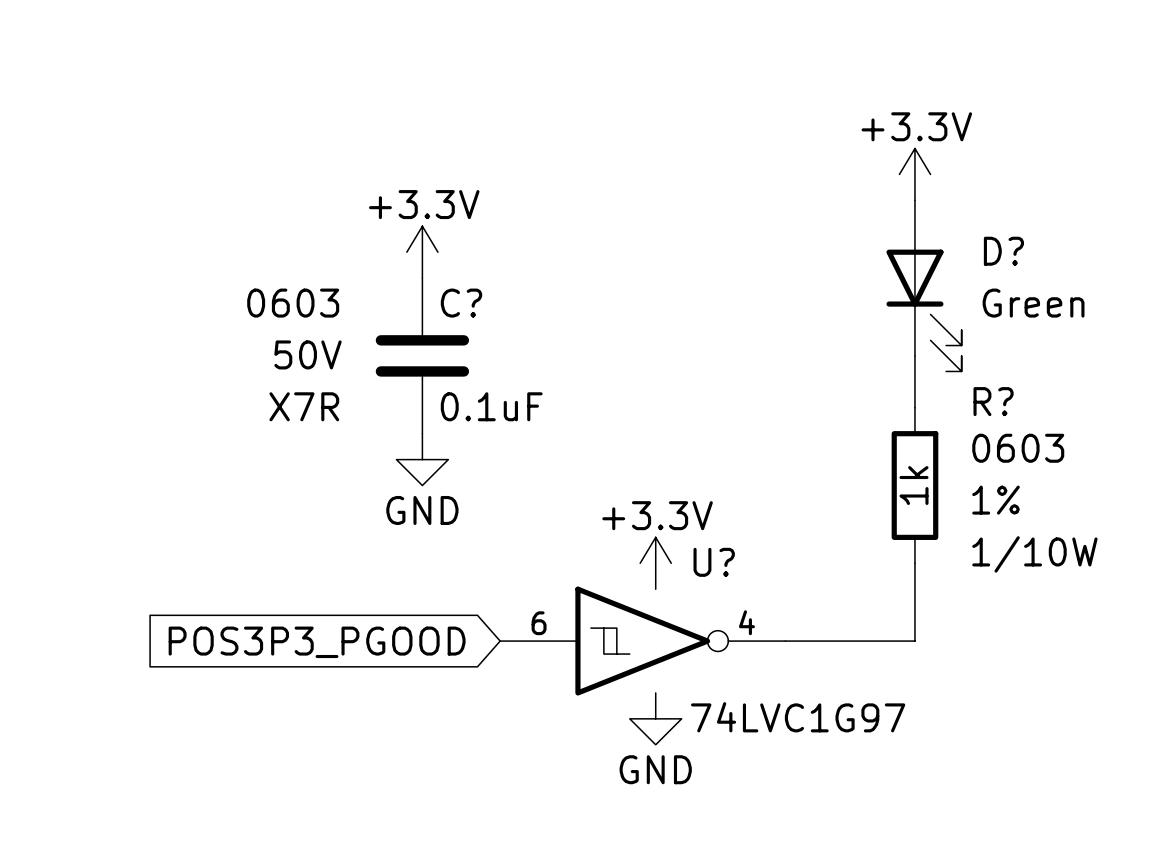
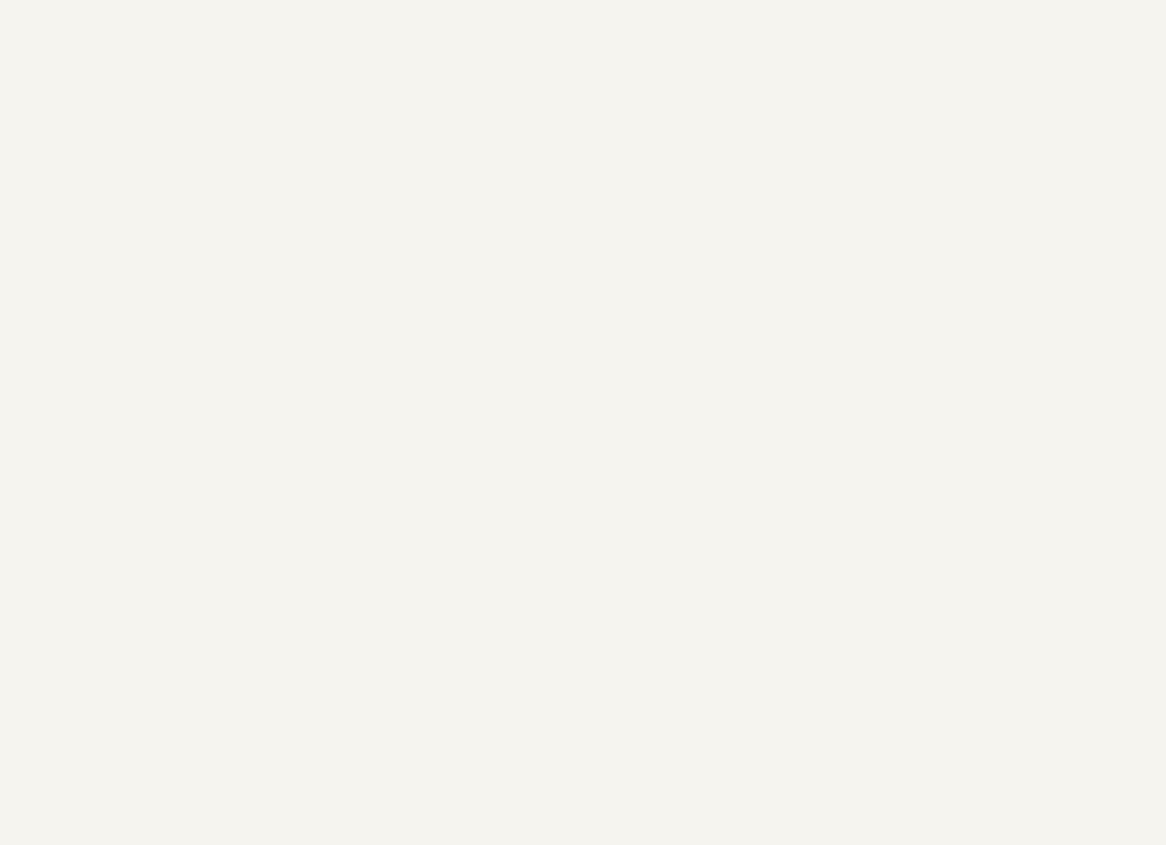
power symbol: +3.3V (914, 174) -> none
power symbol: +3.3V (422, 252) -> none
D?: Green (924, 285) -> none
C?: 0.1uF (422, 355) -> none
wire: (914, 355) (914, 407) -> none
power symbol: GND (422, 459) -> none
R?: 1k (914, 485) -> none
power symbol: +3.3V (655, 563) -> none
wire: (914, 563) (914, 641) (785, 641) -> none
U?: 74LVC1G97 (642, 641) -> none
global label: POS3P3_PGOOD (317, 642) -> none
power symbol: GND (655, 718) -> none

